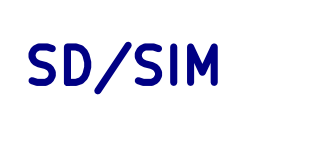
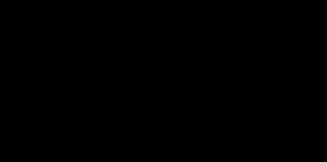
text: SD/SIM (123, 68) -> none

